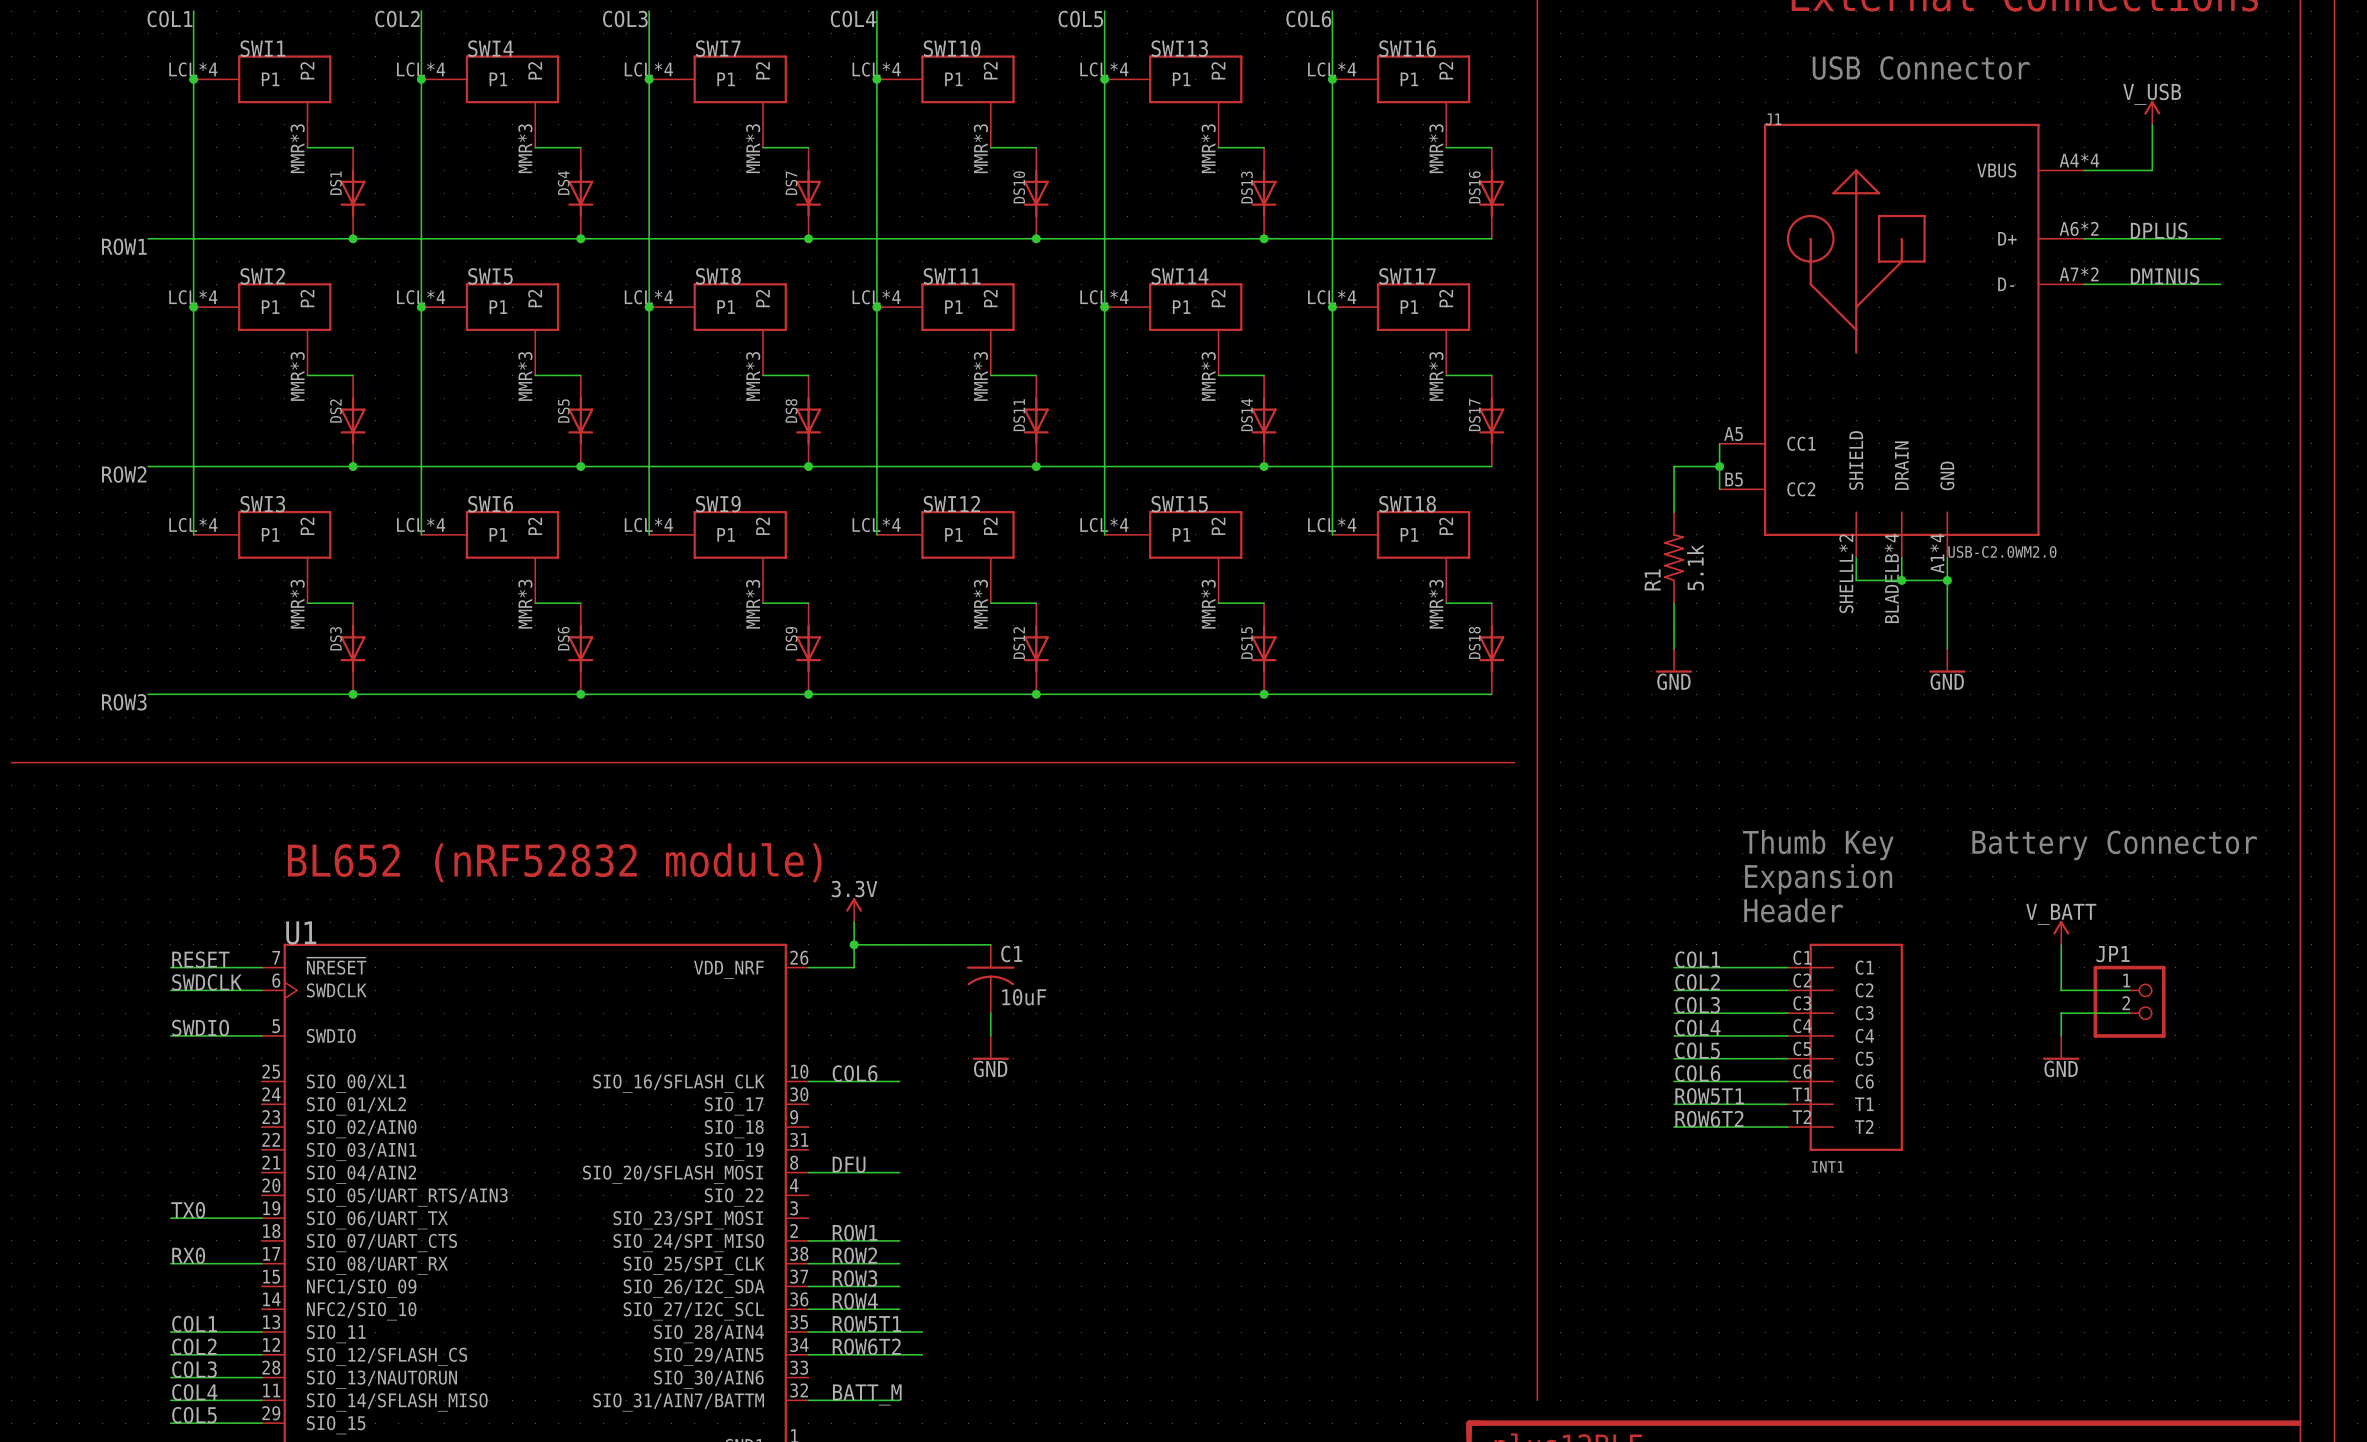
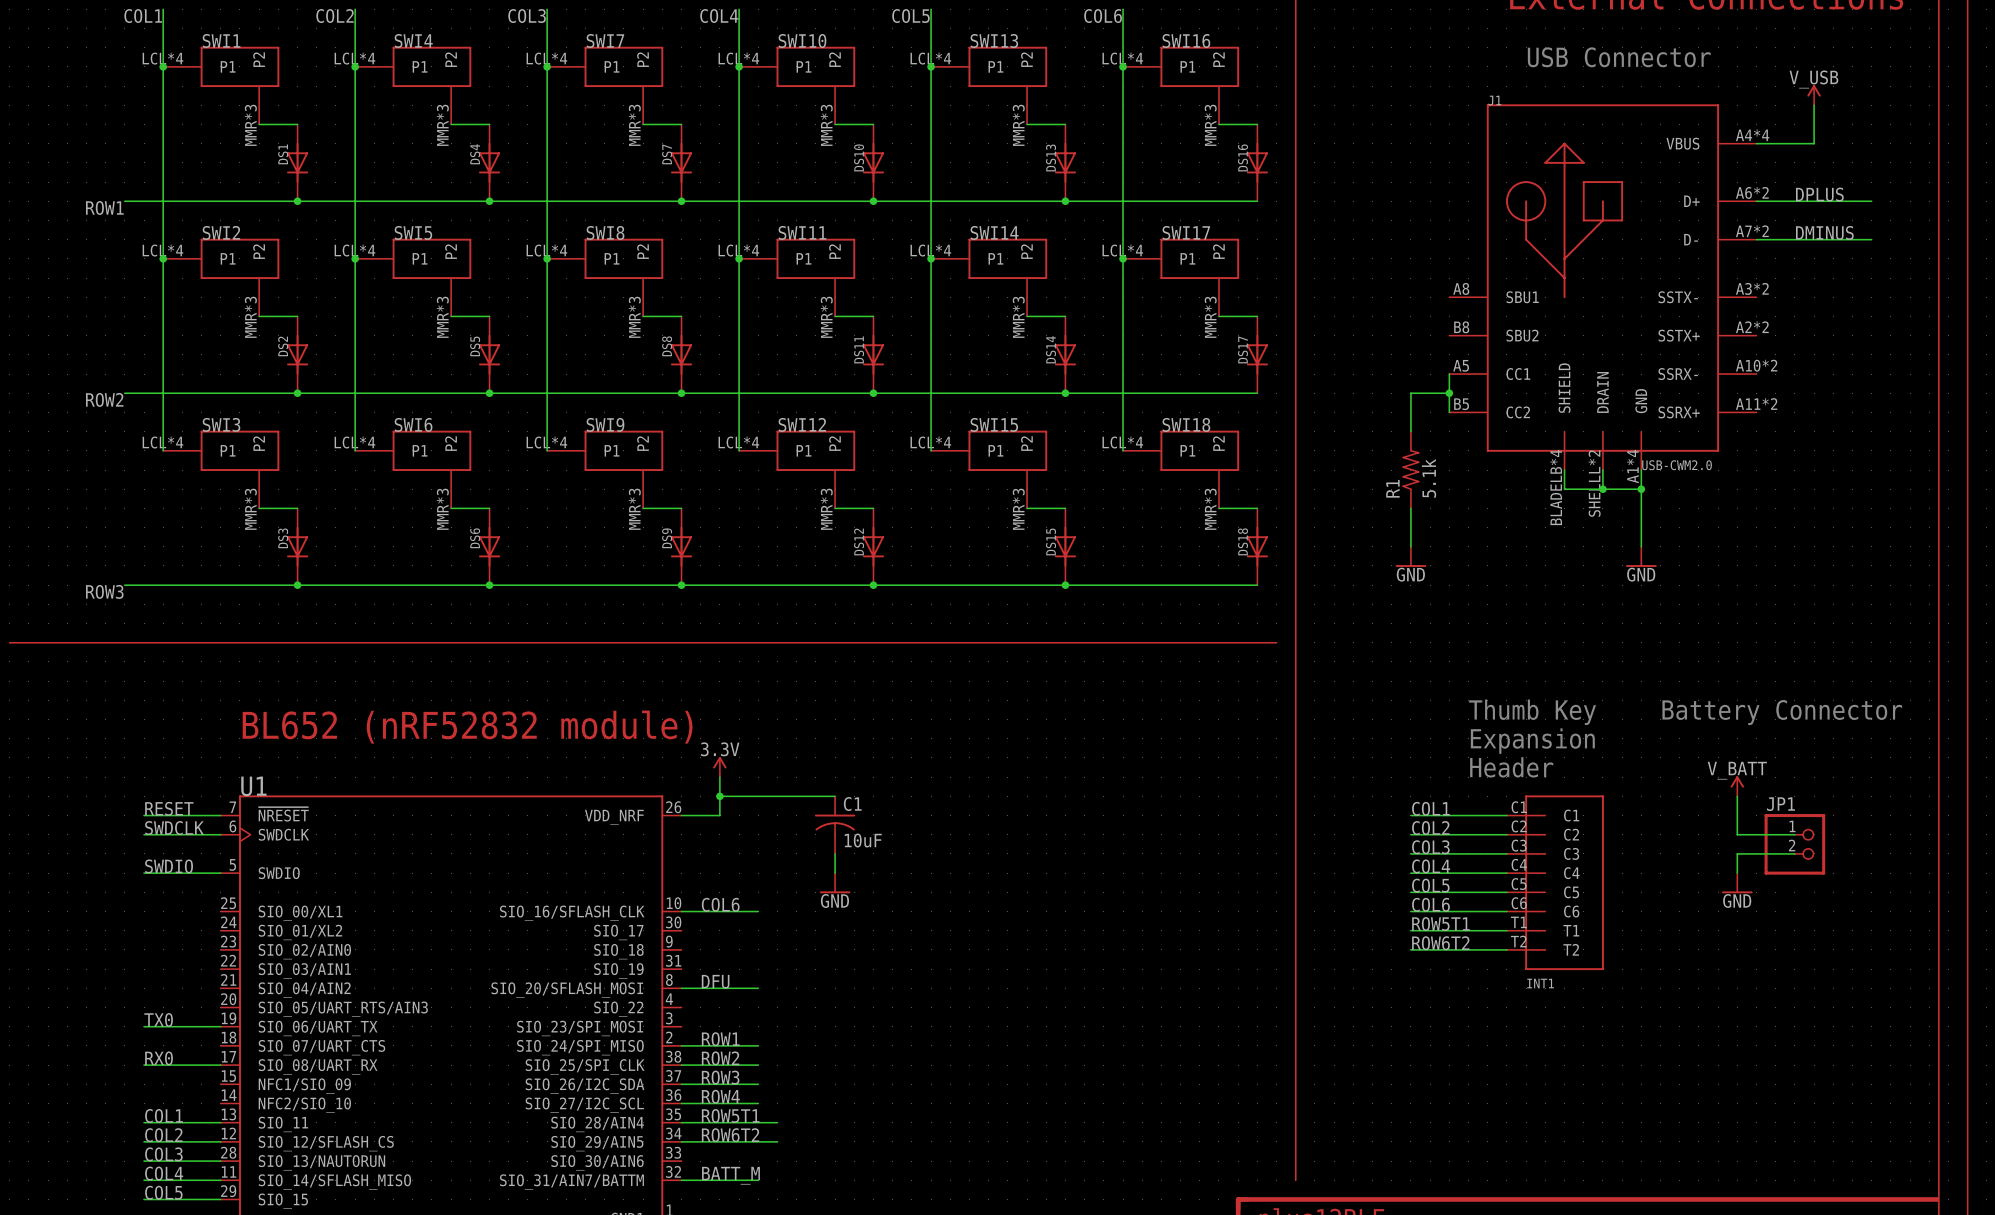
J1 symbol: [1719, 123, 2085, 558] -> [1449, 104, 1757, 471]
J1 value: USB-C2.0WM2.0 (2002, 551) -> USB-CWM2.0 (1677, 465)

